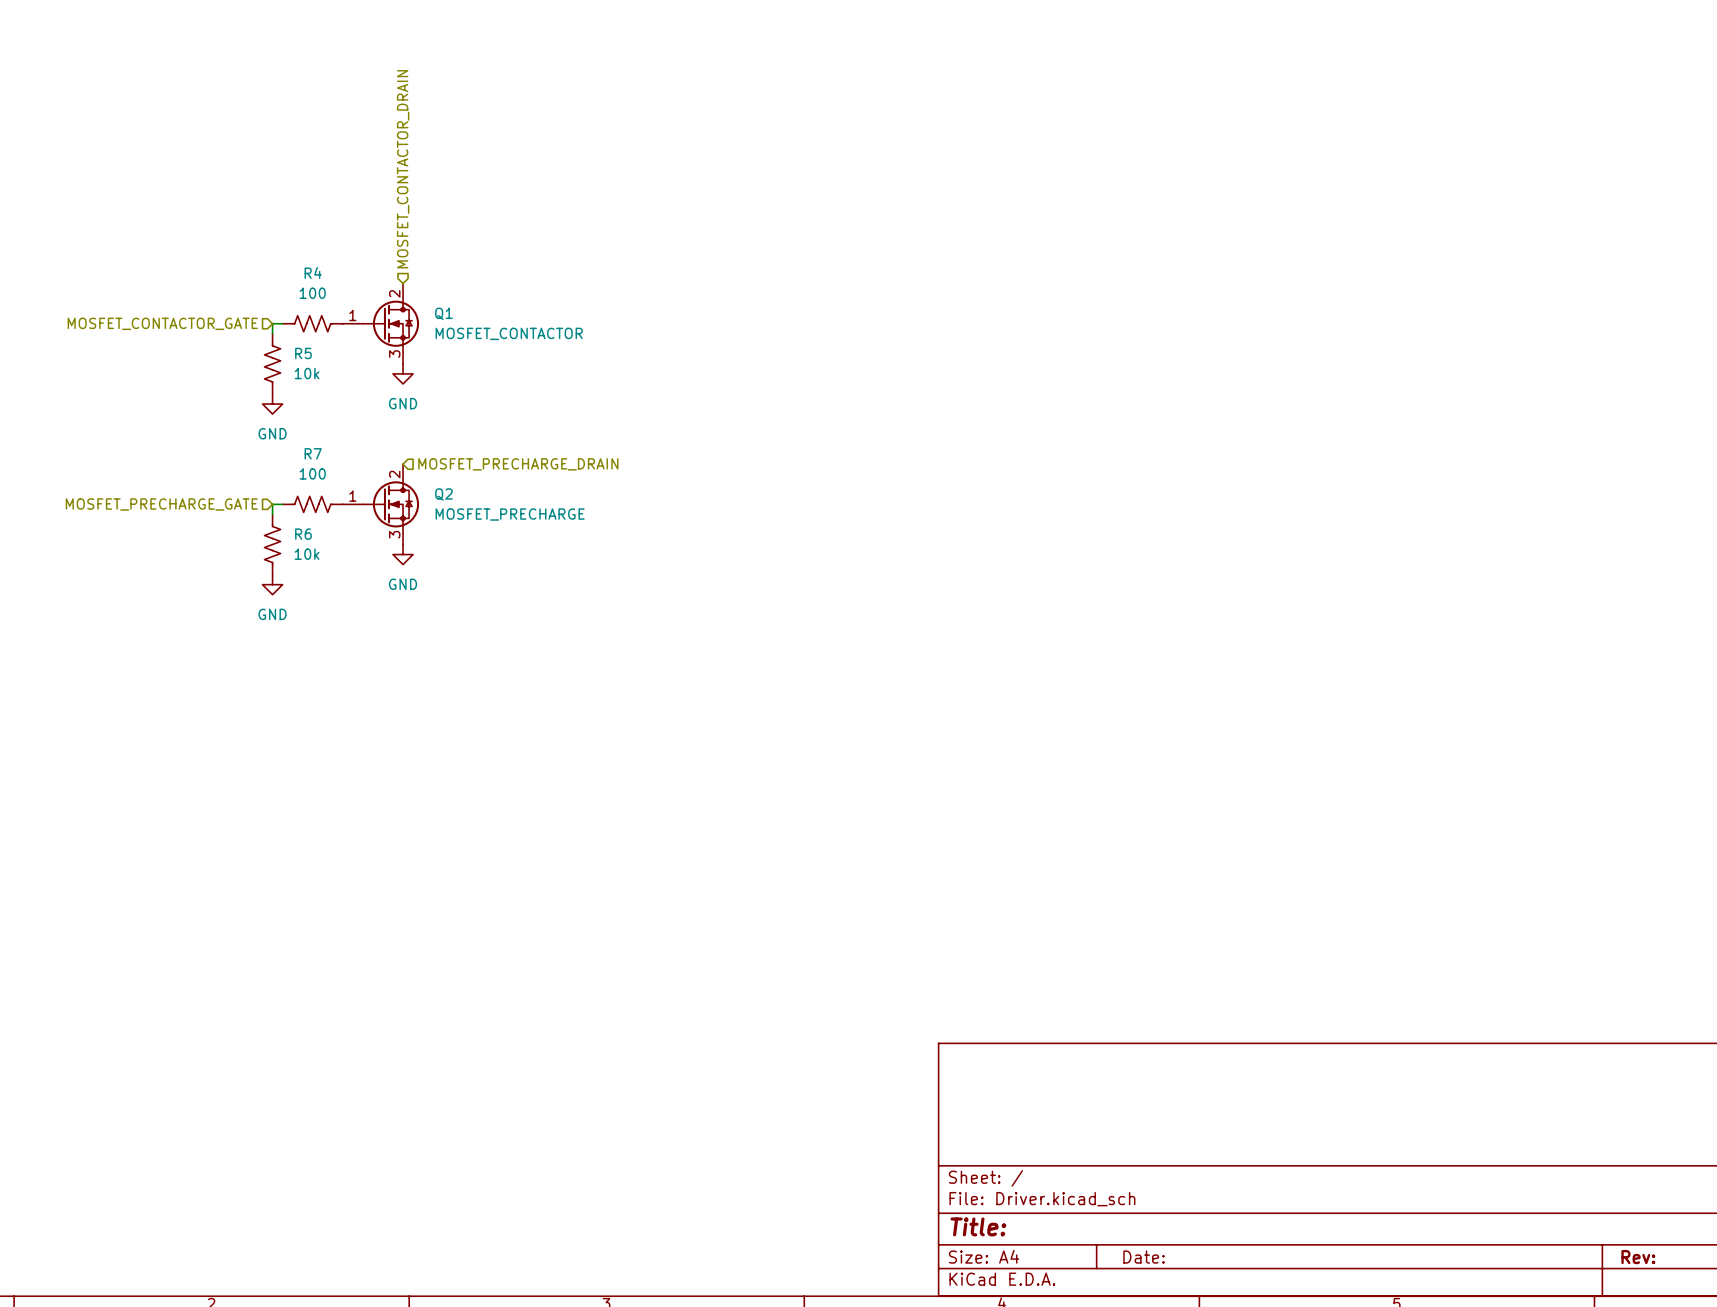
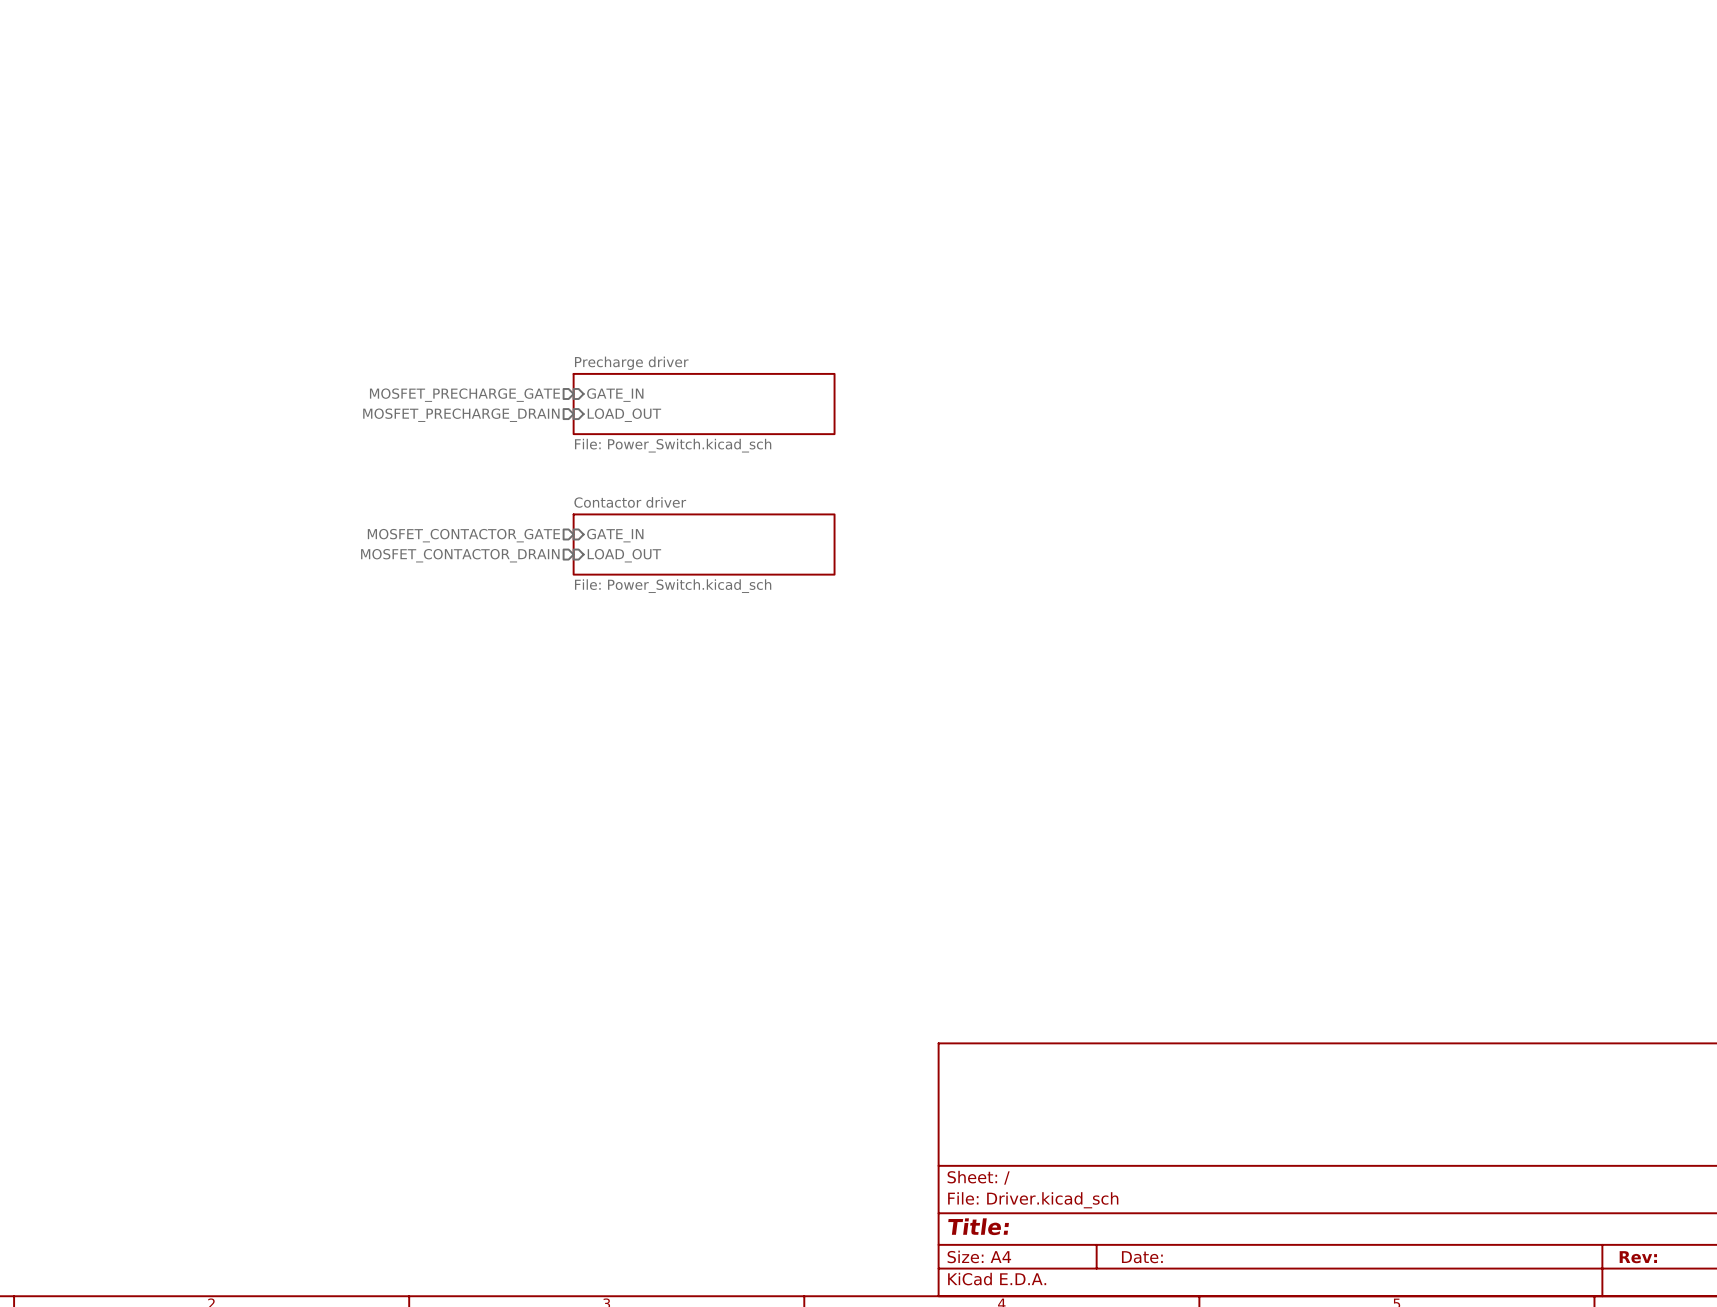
hierarchical label: MOSFET_CONTACTOR_DRAIN (403, 169) -> none
hierarchical label: MOSFET_CONTACTOR_GATE (162, 323) -> none
wire: (282, 323) (272, 323) (272, 333) -> none
R4: 100 (312, 323) -> none
Q1: MOSFET_CONTACTOR (380, 323) -> none
R5: 10k (272, 363) -> none
power symbol: GND (403, 373) -> none
hierarchical label: none -> MOSFET_PRECHARGE_GATE (464, 395)
sheet pin: none -> GATE_IN (615, 395)
power symbol: GND (272, 404) -> none
sheet Precharge driver: none -> File: Power_Switch.kicad_sch (704, 404)
sheet pin: none -> LOAD_OUT (624, 415)
hierarchical label rotation: 0° (518, 464) -> 180° (461, 415)
hierarchical label: MOSFET_PRECHARGE_GATE (161, 504) -> none
wire: (282, 504) (272, 504) (272, 514) -> none
R7: 100 (312, 504) -> none
Q2: MOSFET_PRECHARGE (380, 504) -> none
hierarchical label: none -> MOSFET_CONTACTOR_GATE (463, 535)
sheet pin: none -> GATE_IN (615, 535)
R6: 10k (272, 544) -> none
sheet Contactor driver: none -> File: Power_Switch.kicad_sch (704, 544)
power symbol: GND (403, 554) -> none
hierarchical label: none -> MOSFET_CONTACTOR_DRAIN (460, 555)
sheet pin: none -> LOAD_OUT (624, 555)
power symbol: GND (272, 584) -> none

